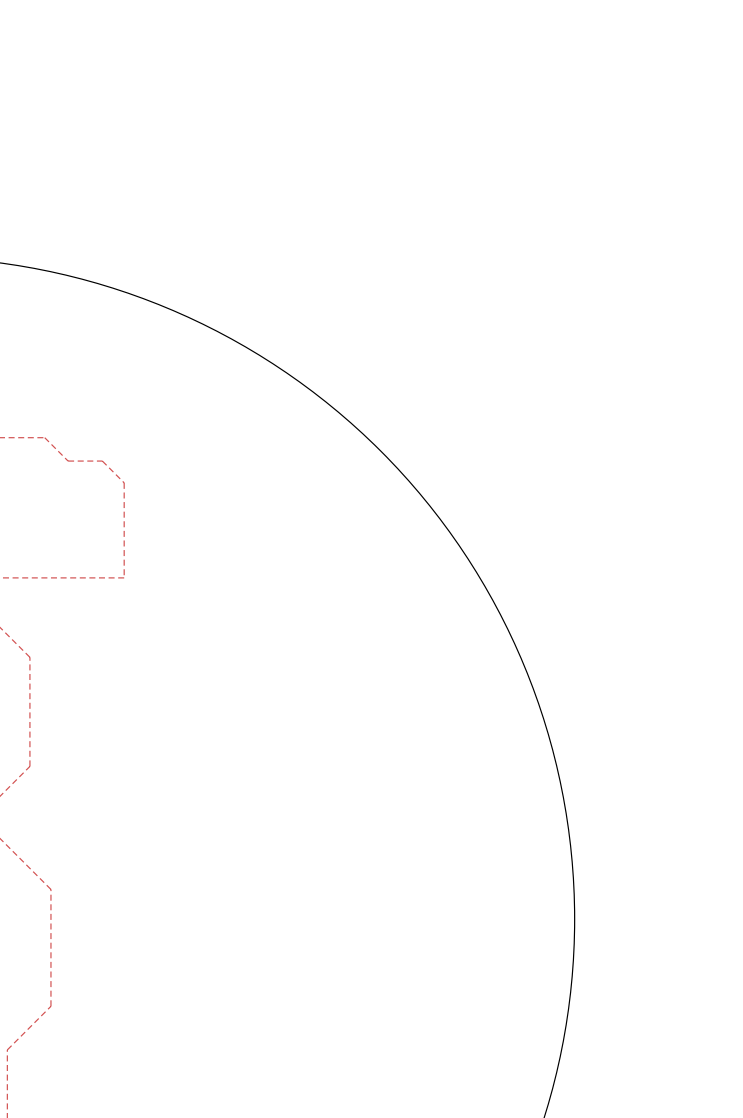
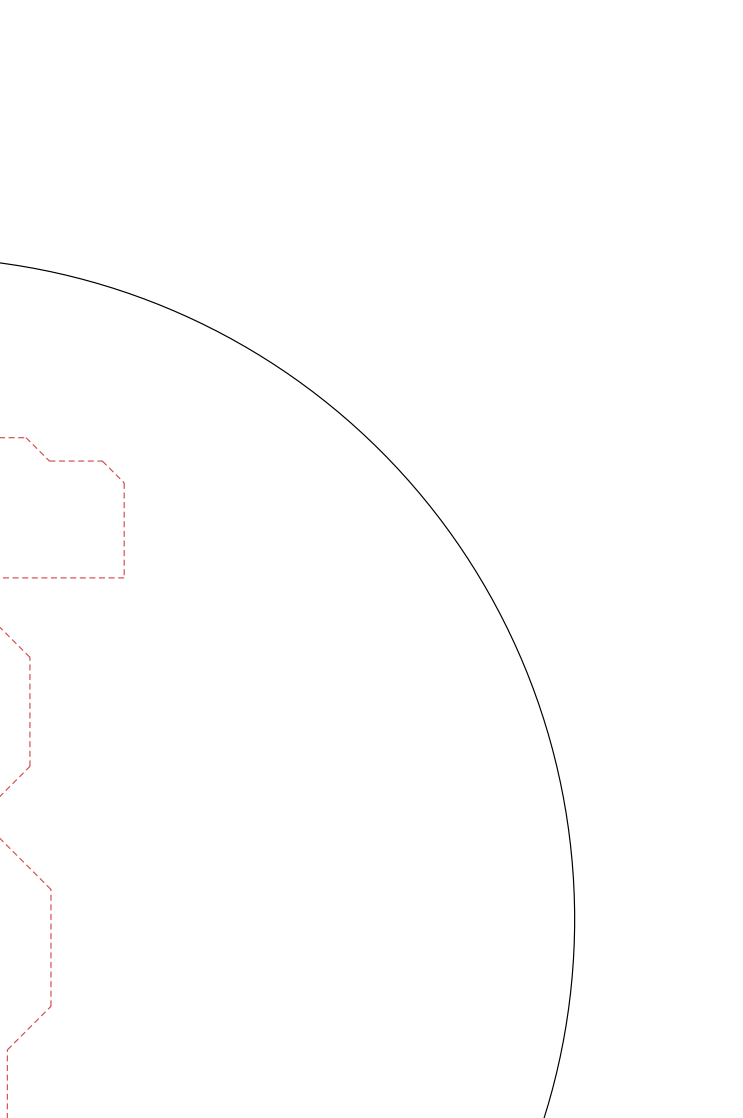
zone outline: (26, 437) (44, 437) (68, 461) -> (26, 437) (49, 461) (68, 461)

